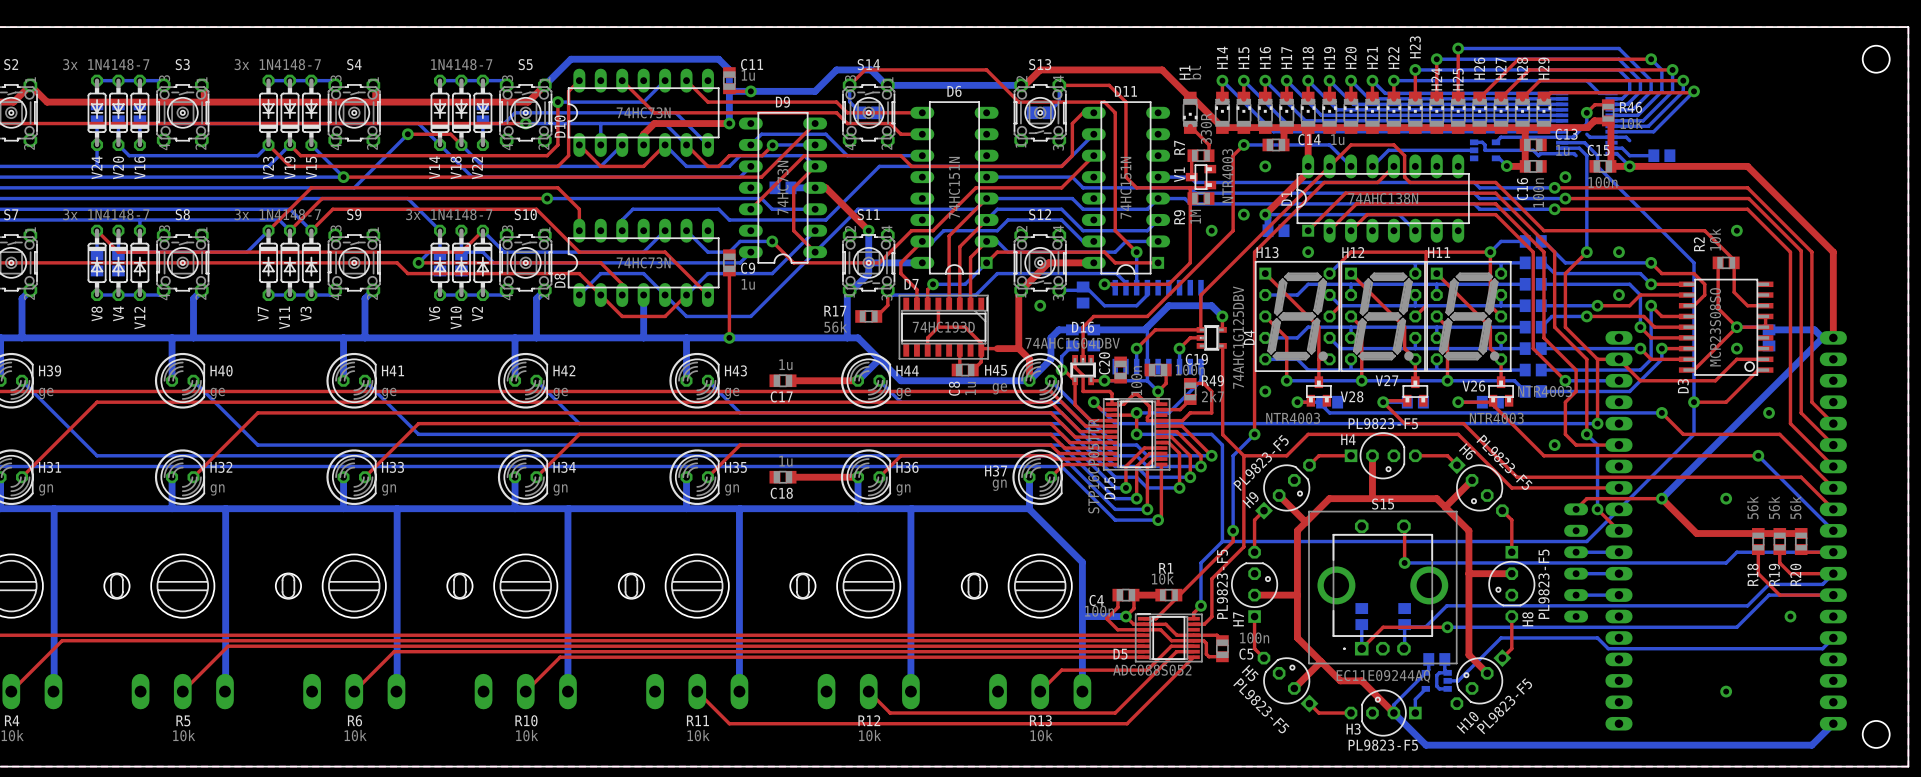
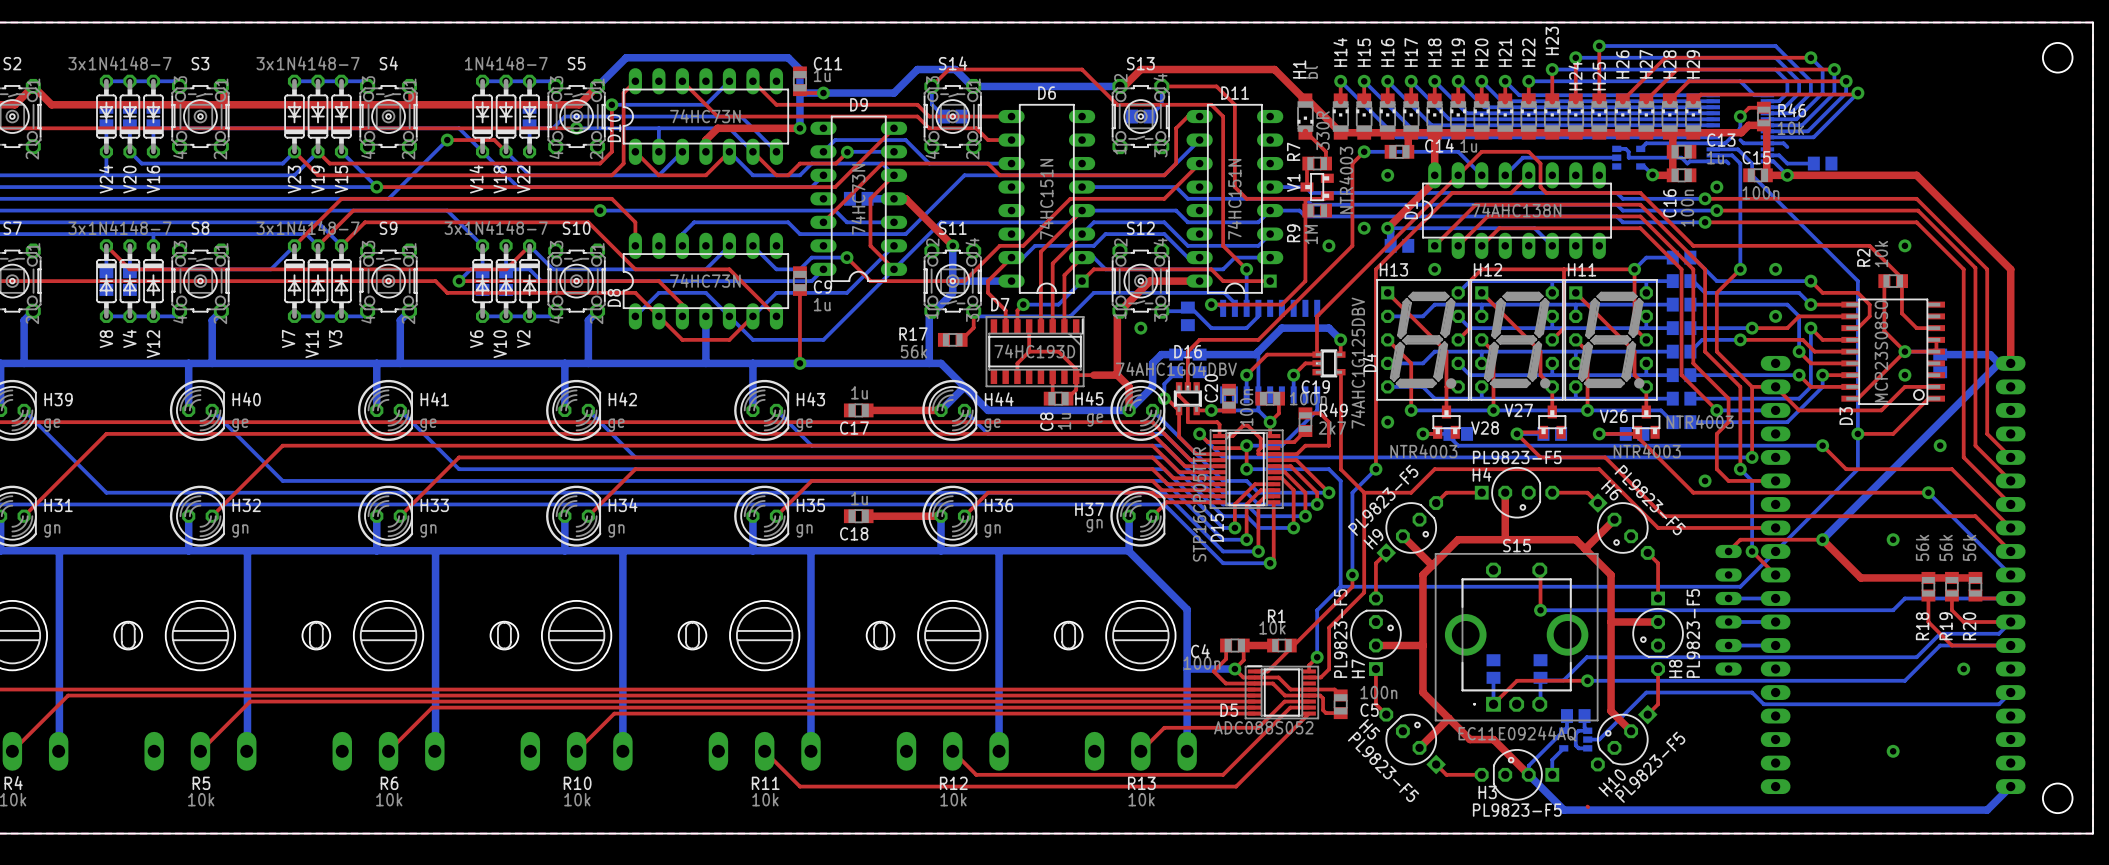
top track: none -> (1587, 806) (1588, 807)

